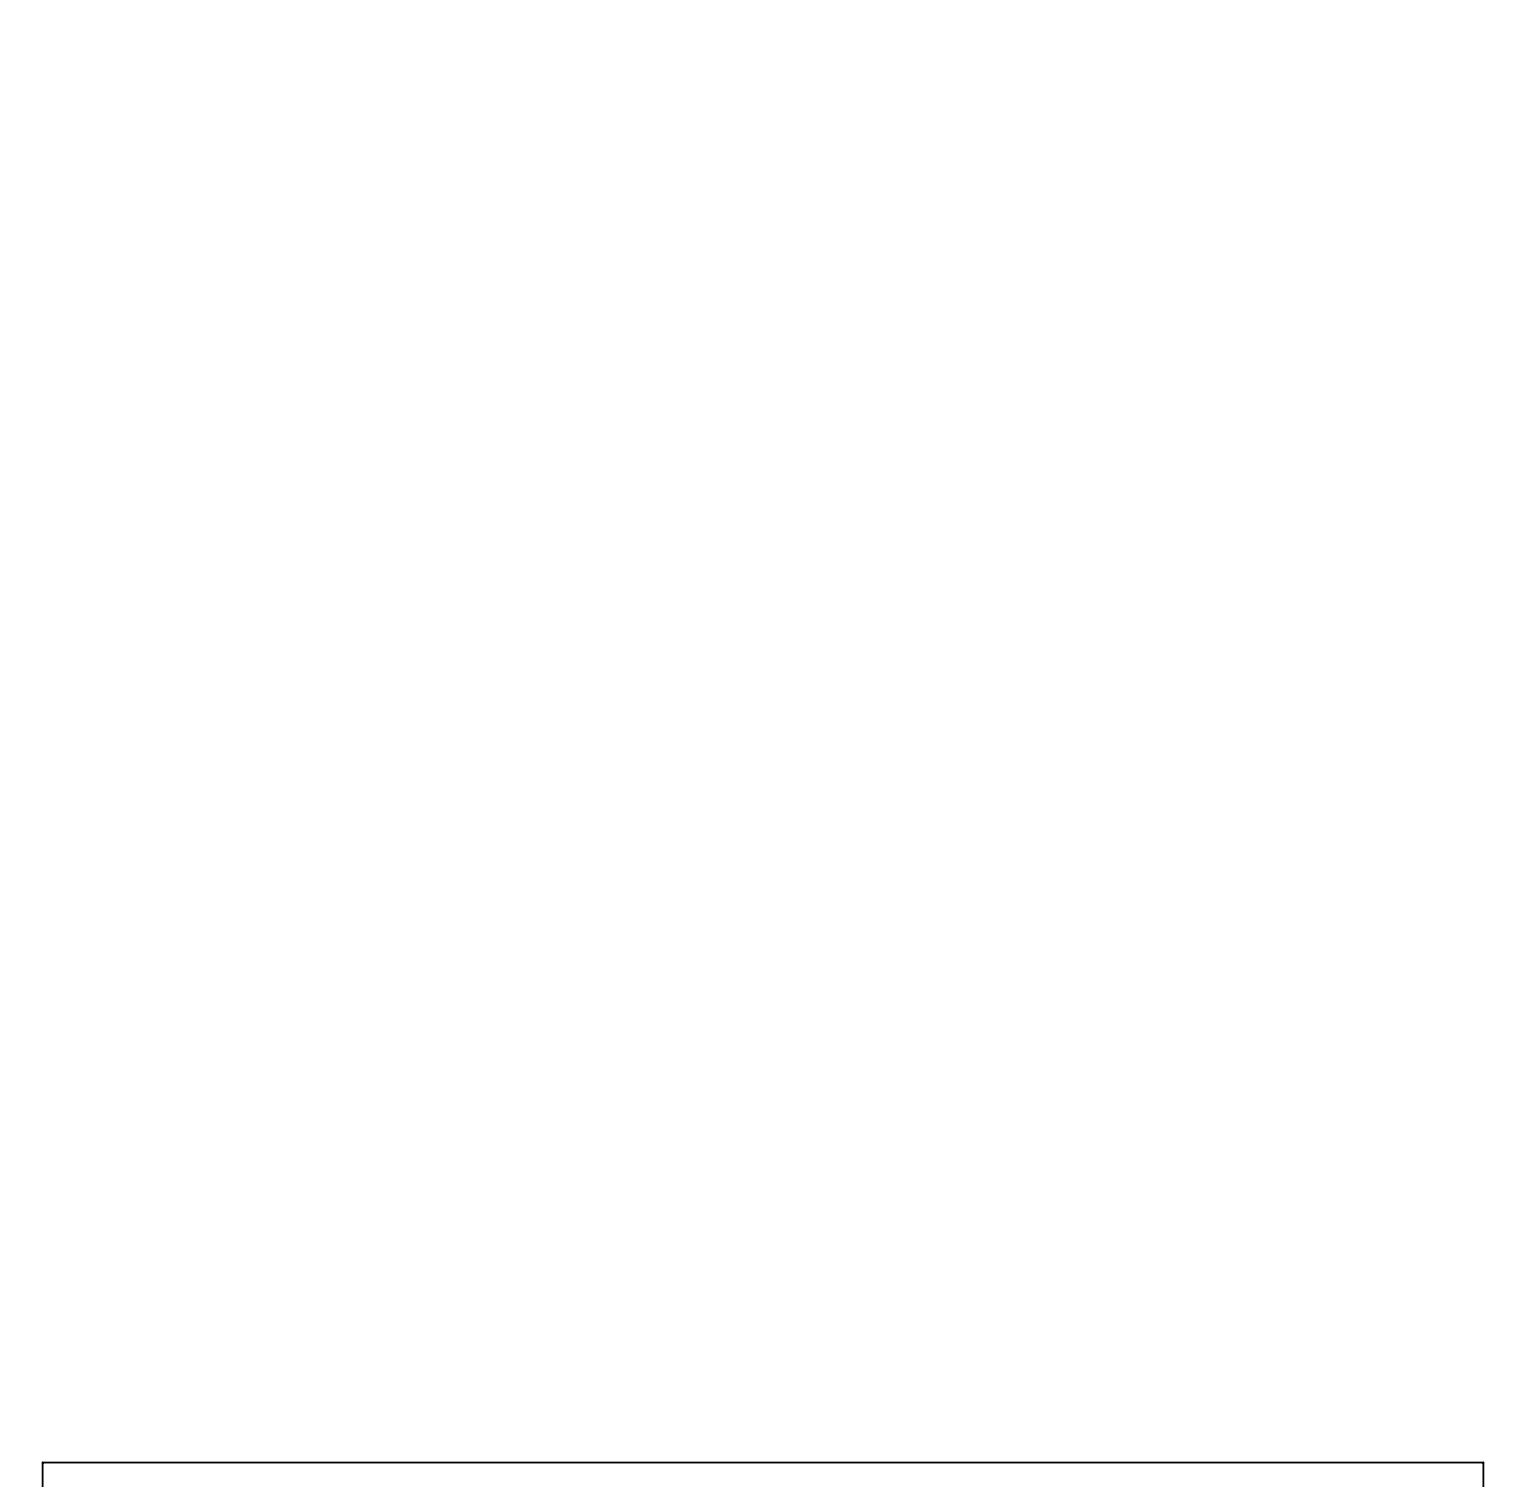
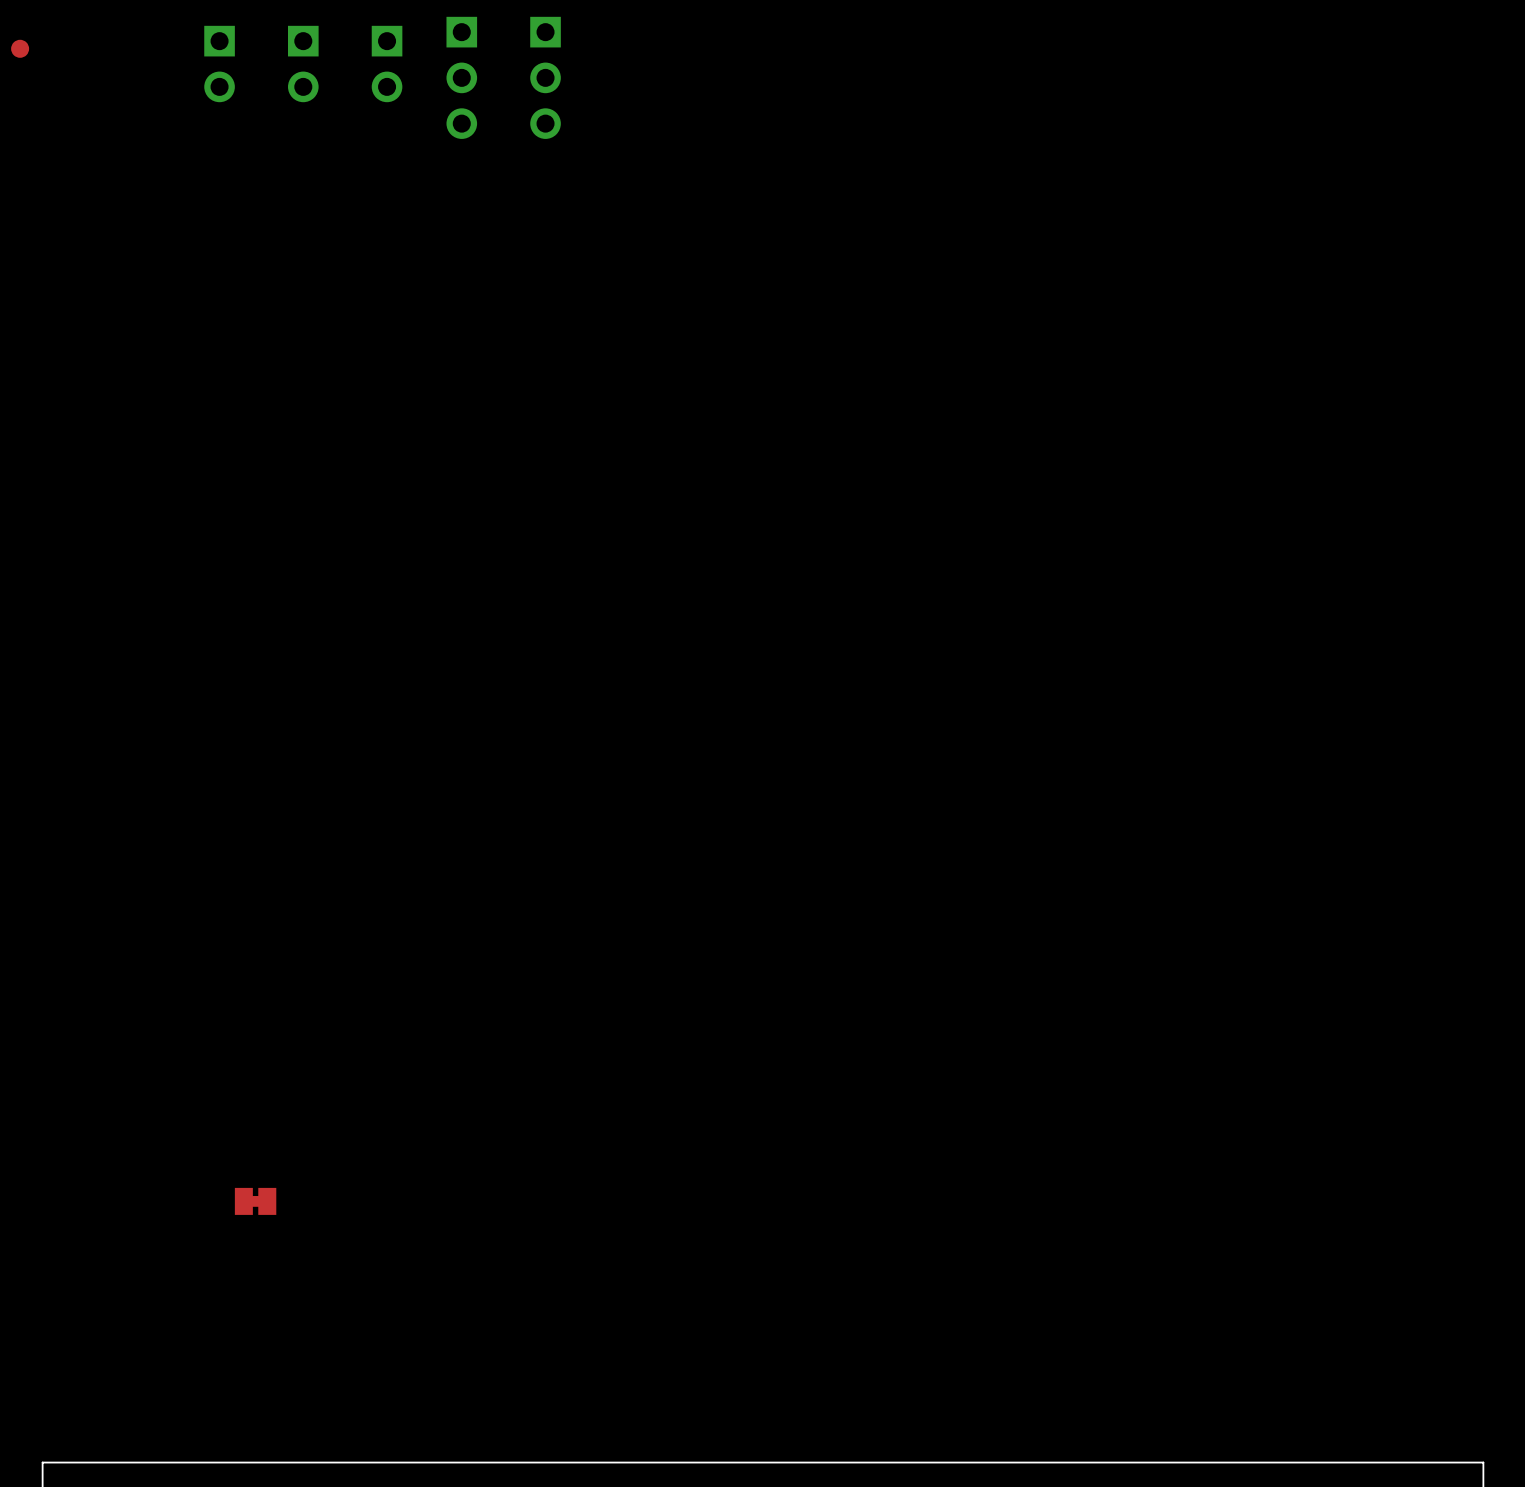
part: none -> (20, 48)
part: none -> (219, 64)
part: none -> (303, 64)
part: none -> (387, 64)
part: none -> (461, 77)
part: none -> (545, 77)
part: none -> (255, 1201)

